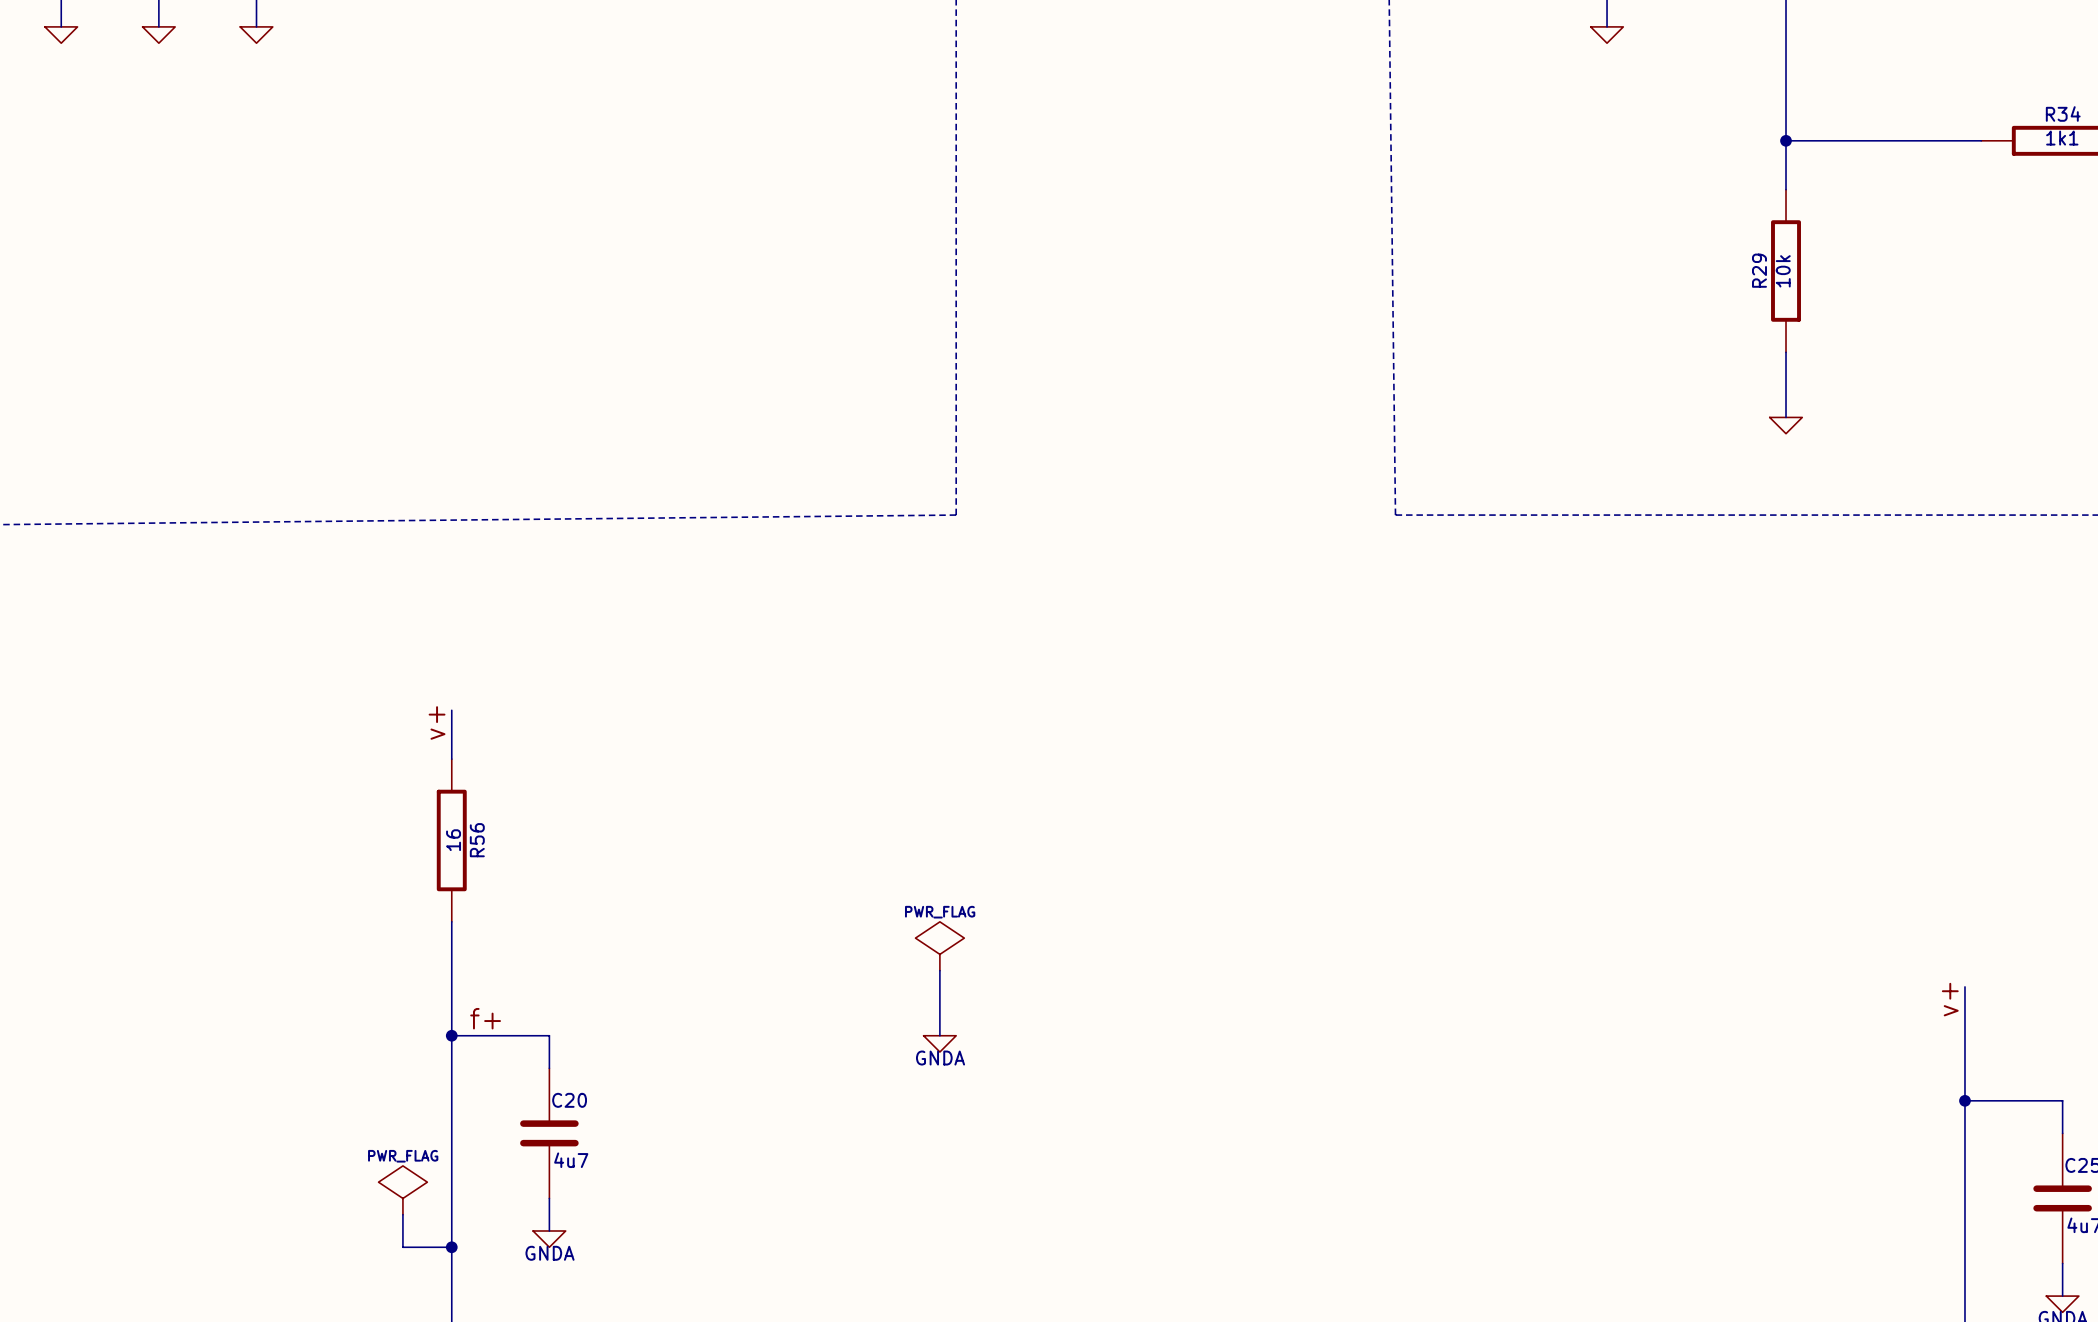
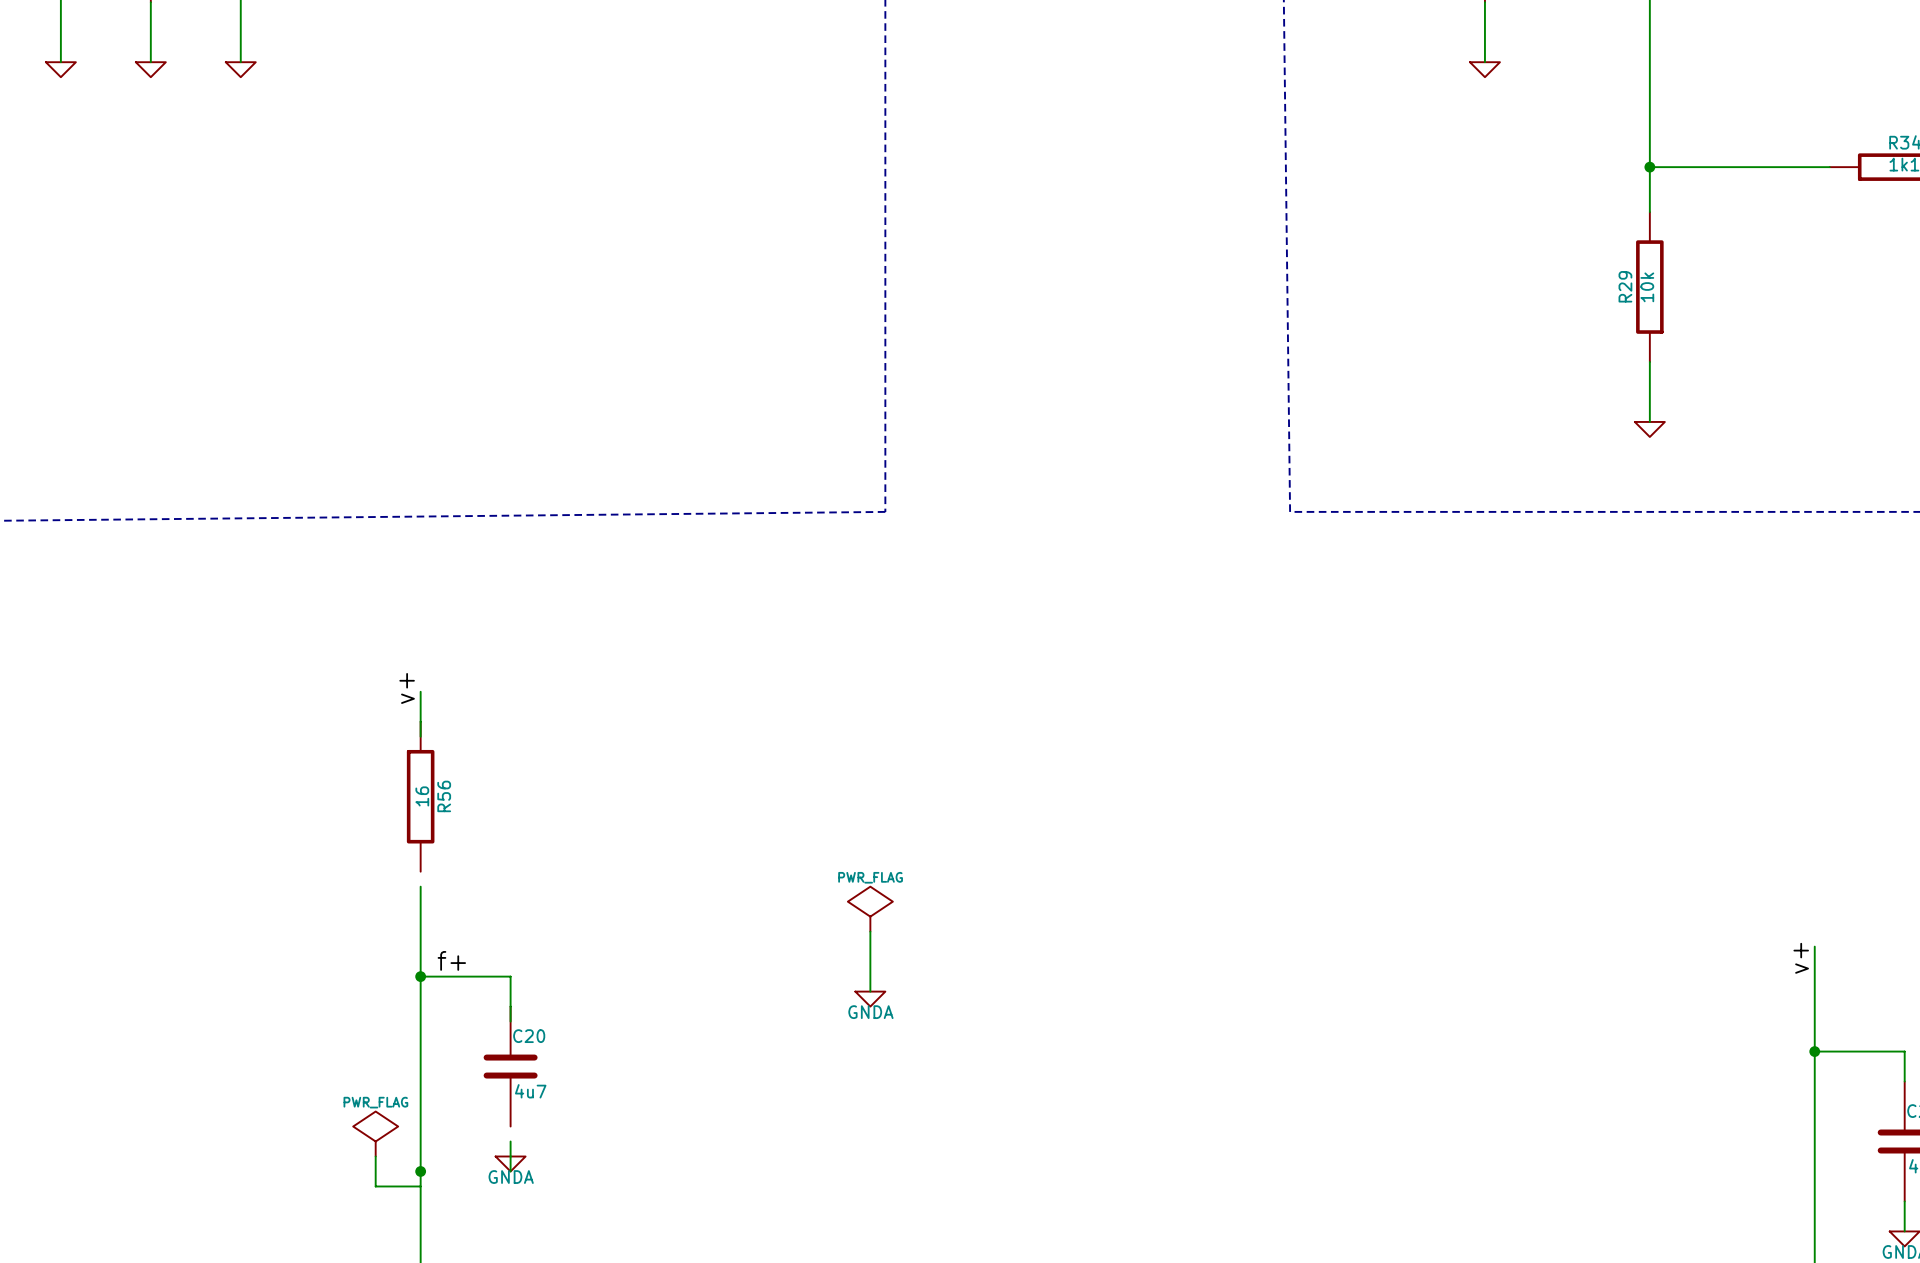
label position: v+ (437, 722) -> v+ (407, 688)
R56 position: (451, 840) -> (420, 796)
label position: f+ (485, 1018) -> f+ (451, 960)
wire: (451, 1035) (549, 1035) -> (420, 976) (510, 976) (510, 991)
junction position: (451, 1035) -> (420, 976)
C20 position: (549, 1133) -> (510, 1066)
power symbol position: GNDA (549, 1239) -> GNDA (510, 1163)
junction position: (451, 1247) -> (420, 1171)

